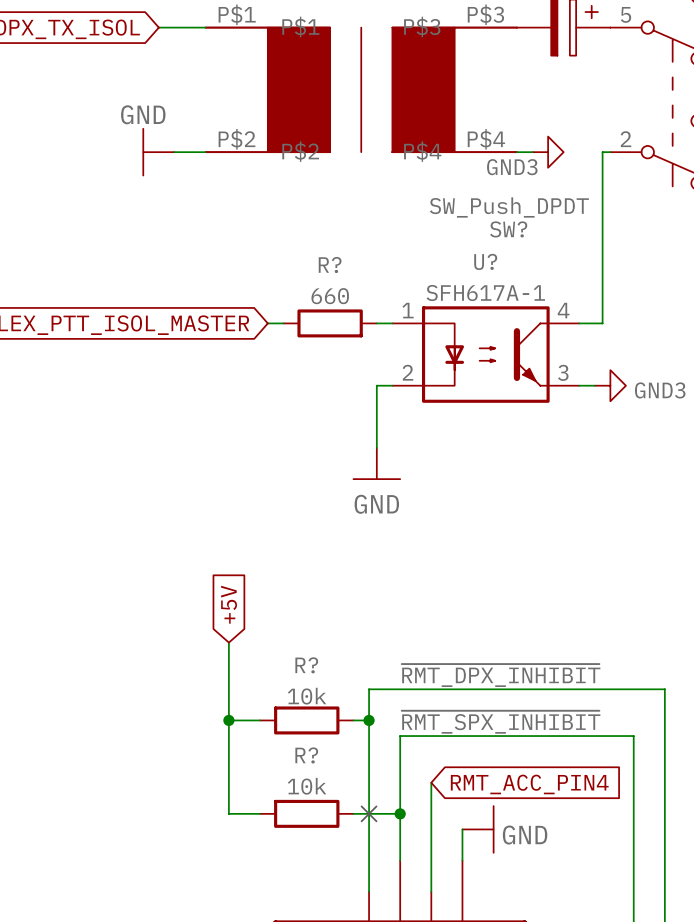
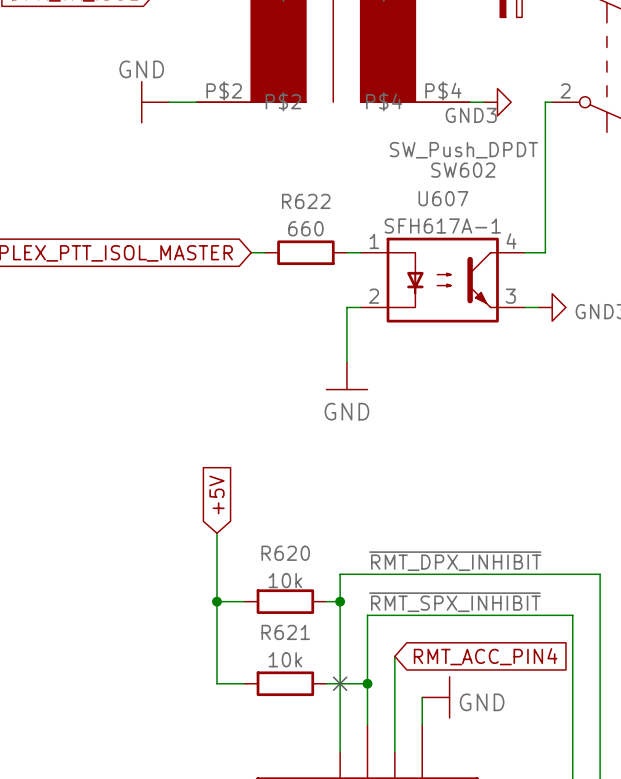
SW? name: SW? (508, 229) -> SW602 (463, 170)
U? name: U? (485, 261) -> U607 (443, 198)
R? name: R? (330, 264) -> R622 (306, 201)
R? name: R? (306, 665) -> R620 (285, 553)
R? name: R? (306, 755) -> R621 (285, 632)

